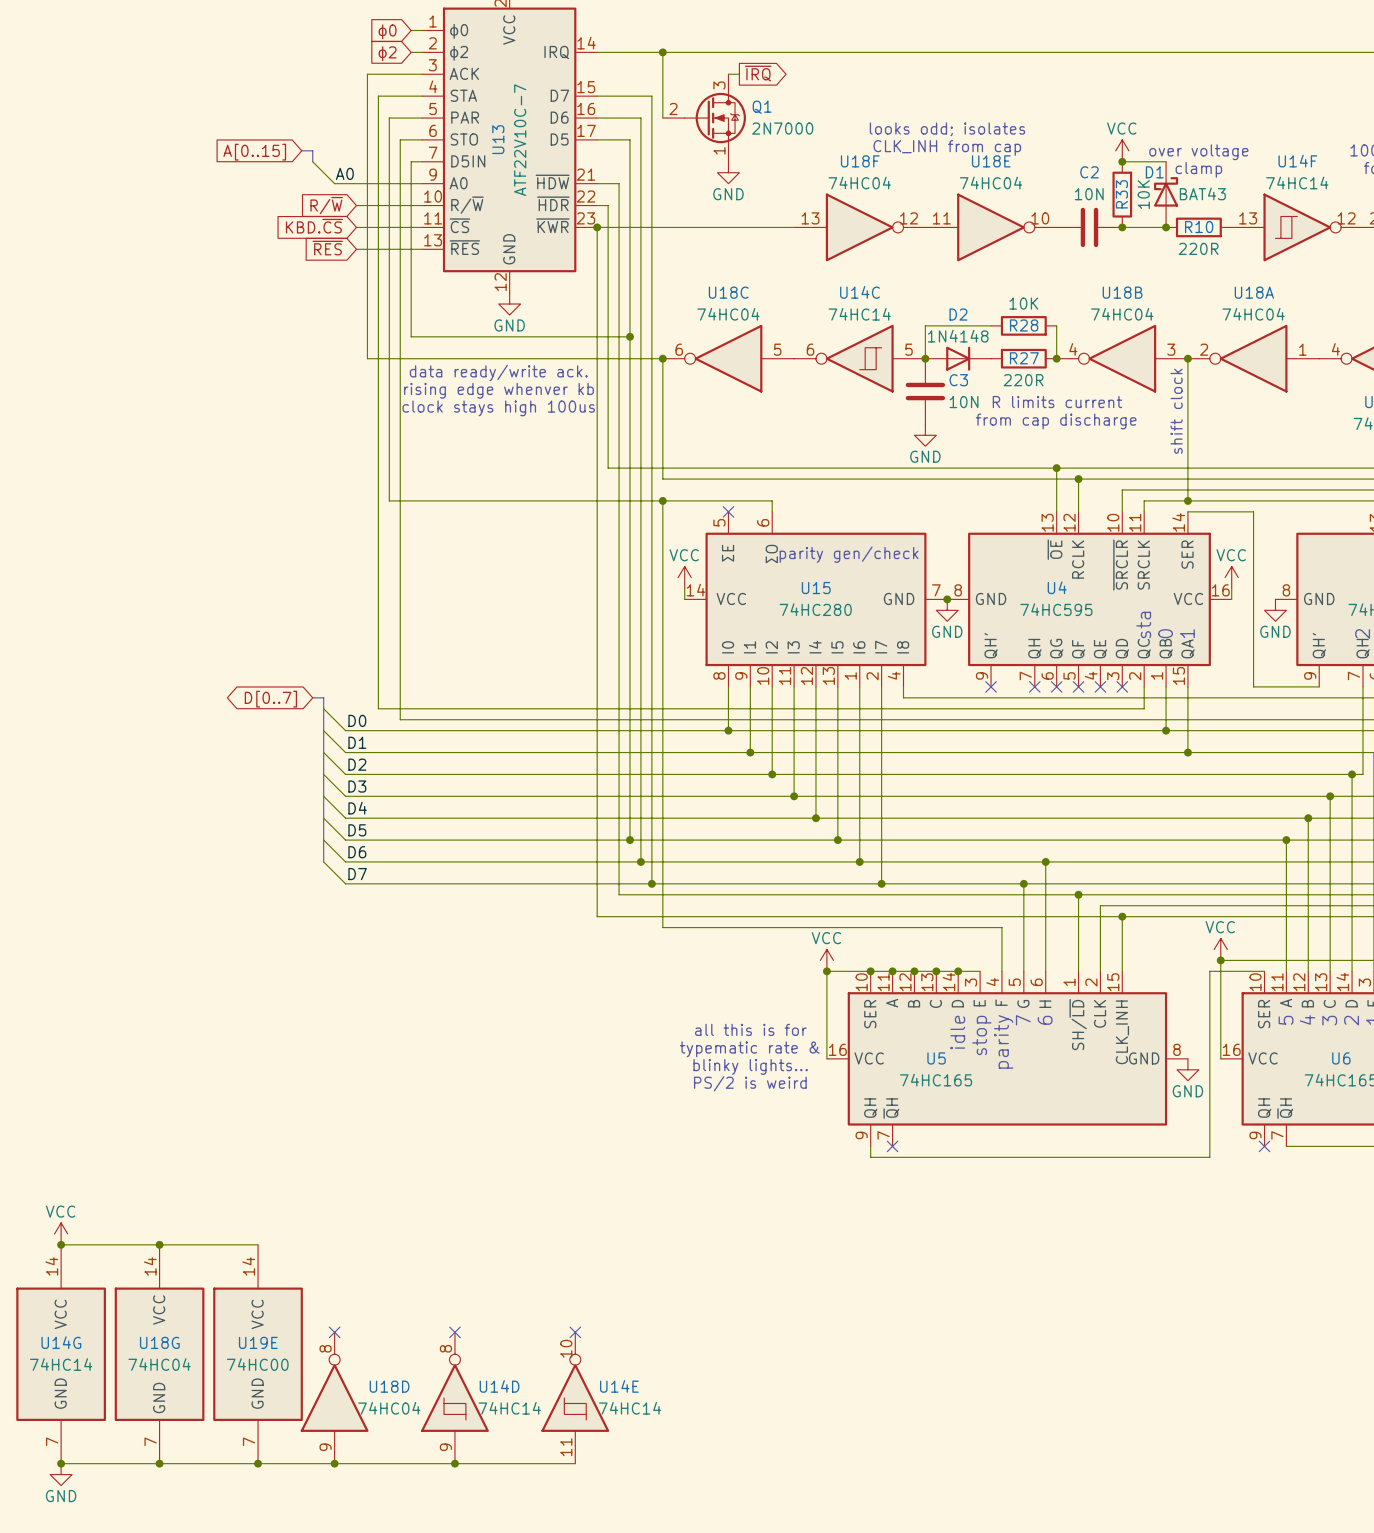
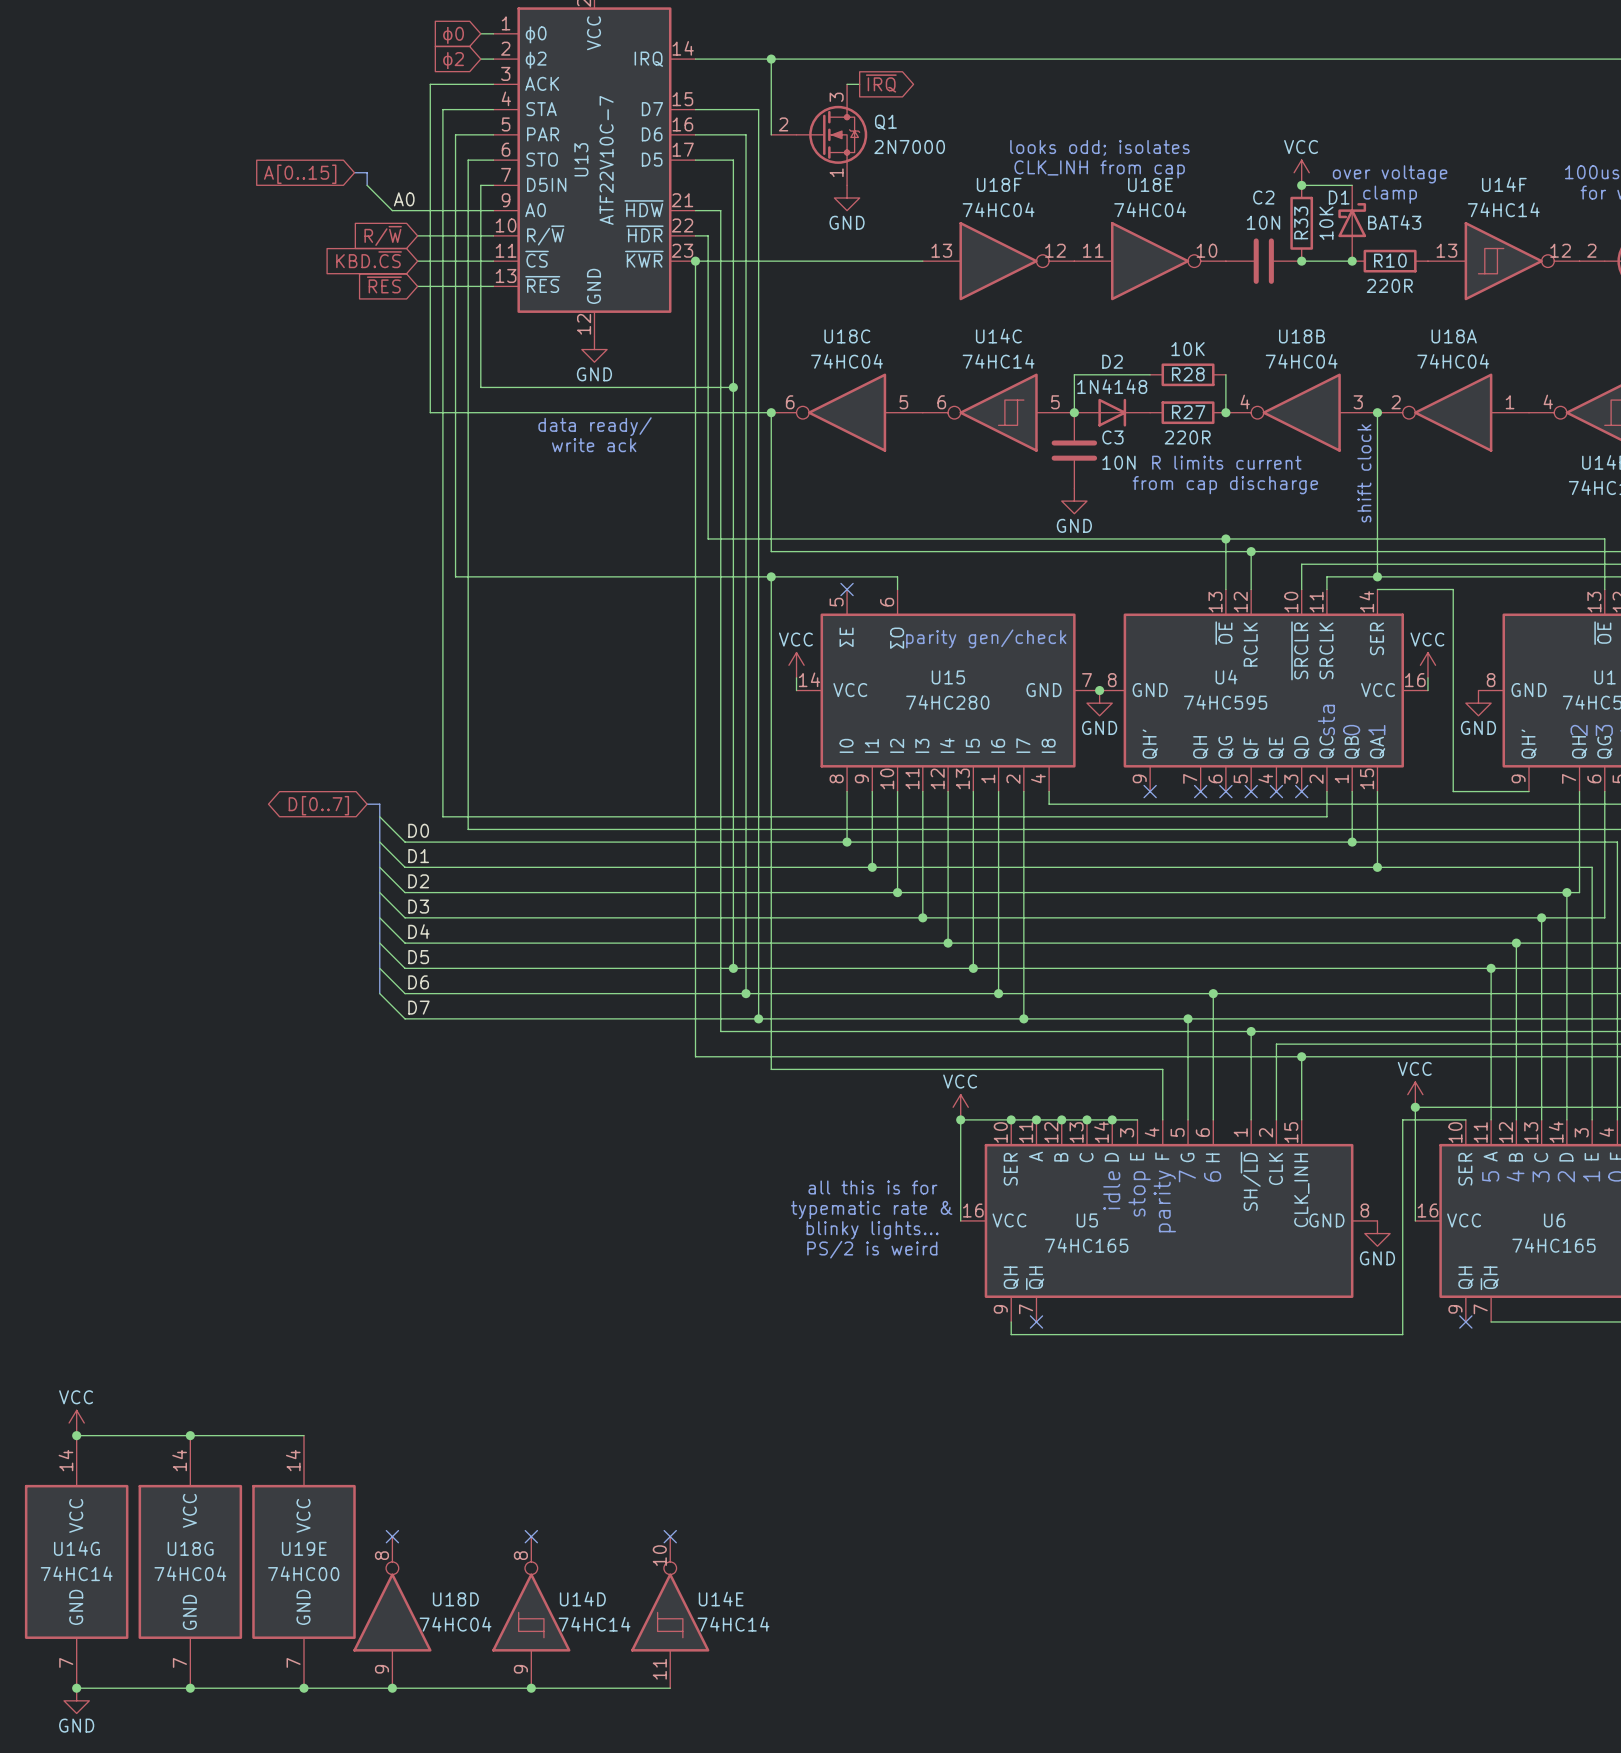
text: data ready/write ack. (498, 372) -> data ready/ (595, 426)
text: none -> write ack (594, 445)
text: rising edge whenver kb (498, 390) -> none
text: clock stays high 100us (498, 408) -> none

